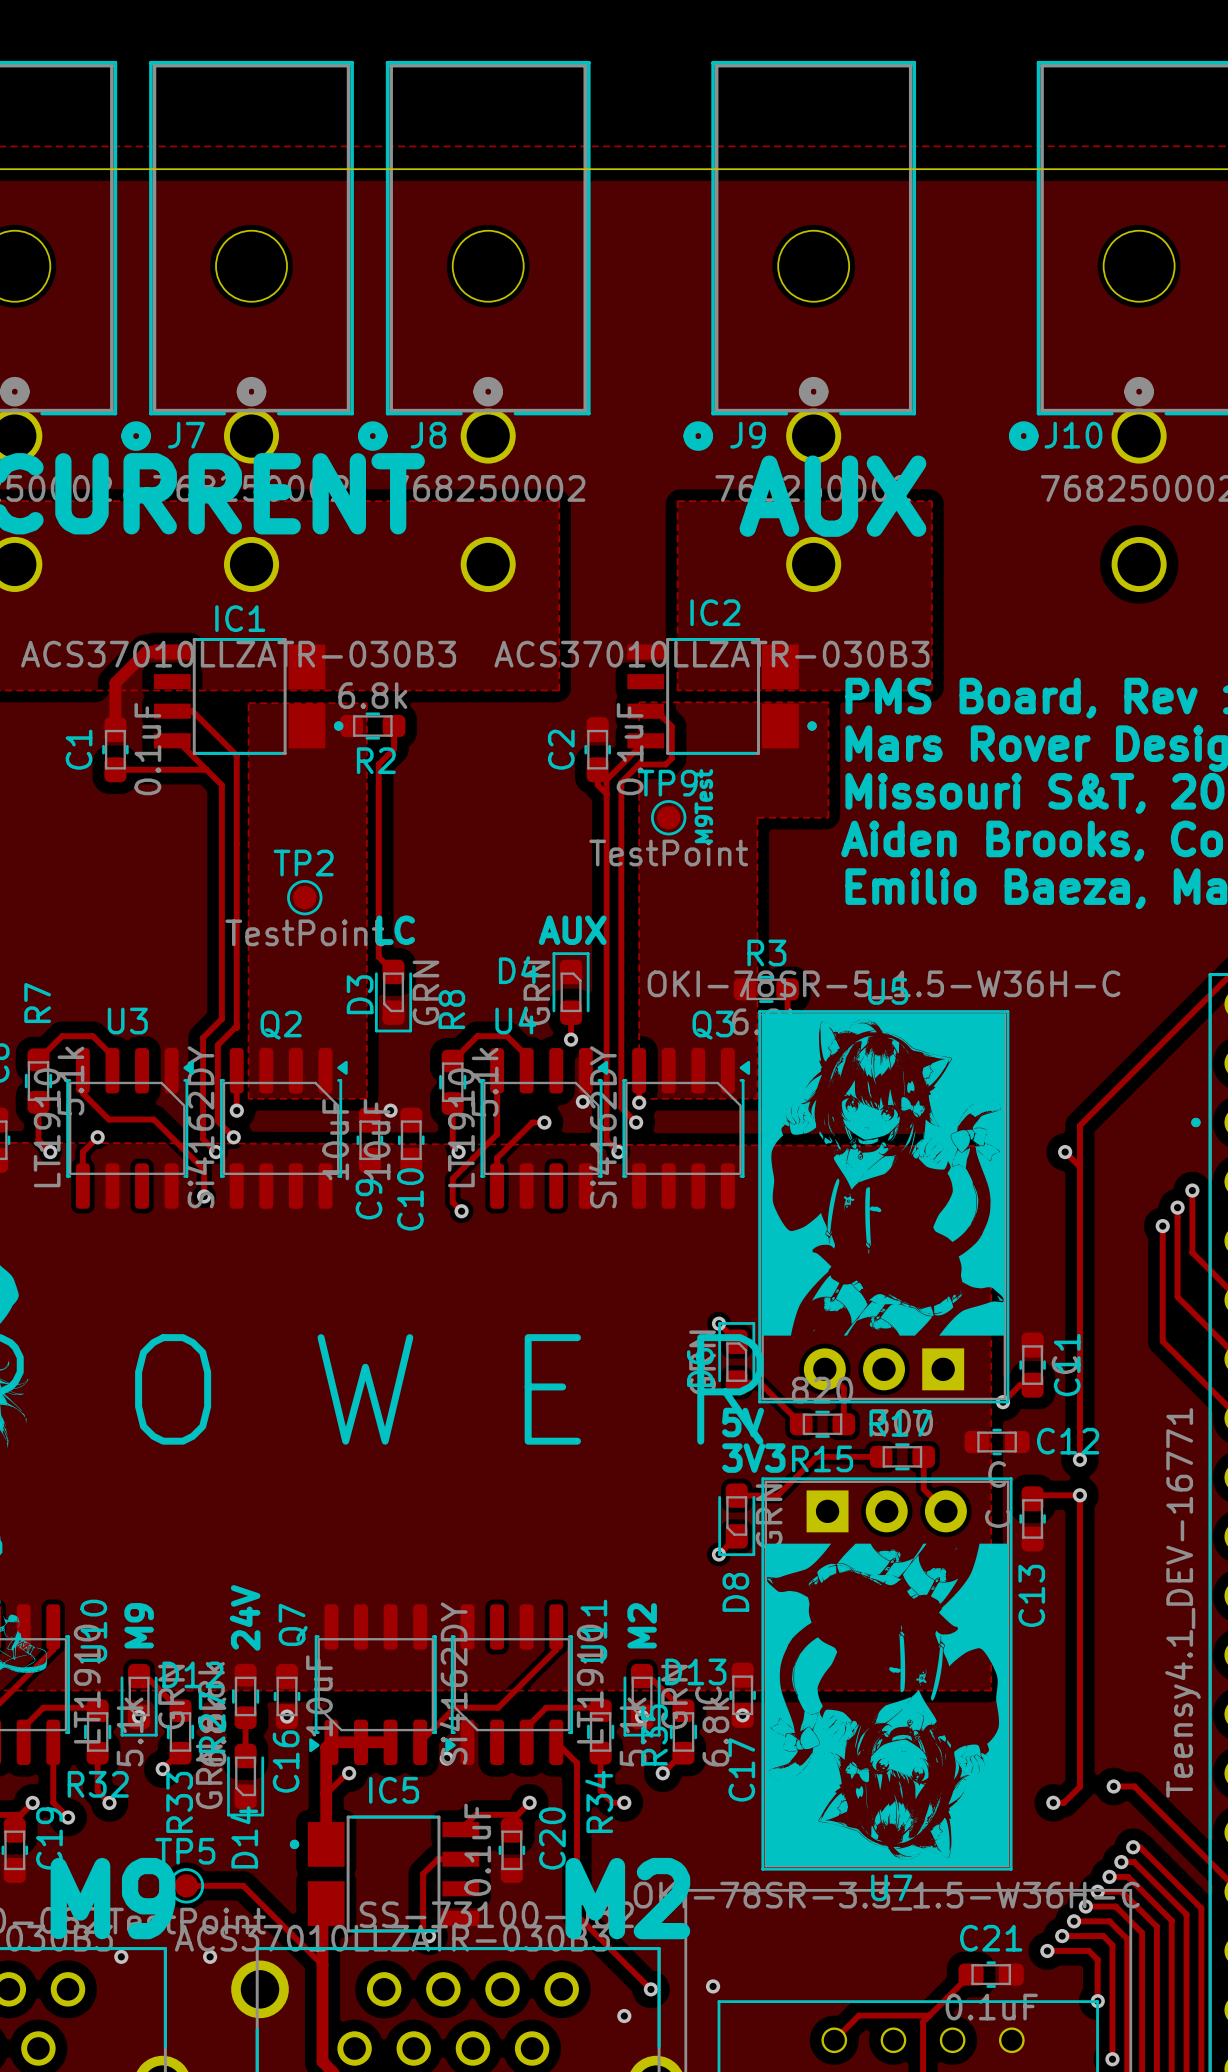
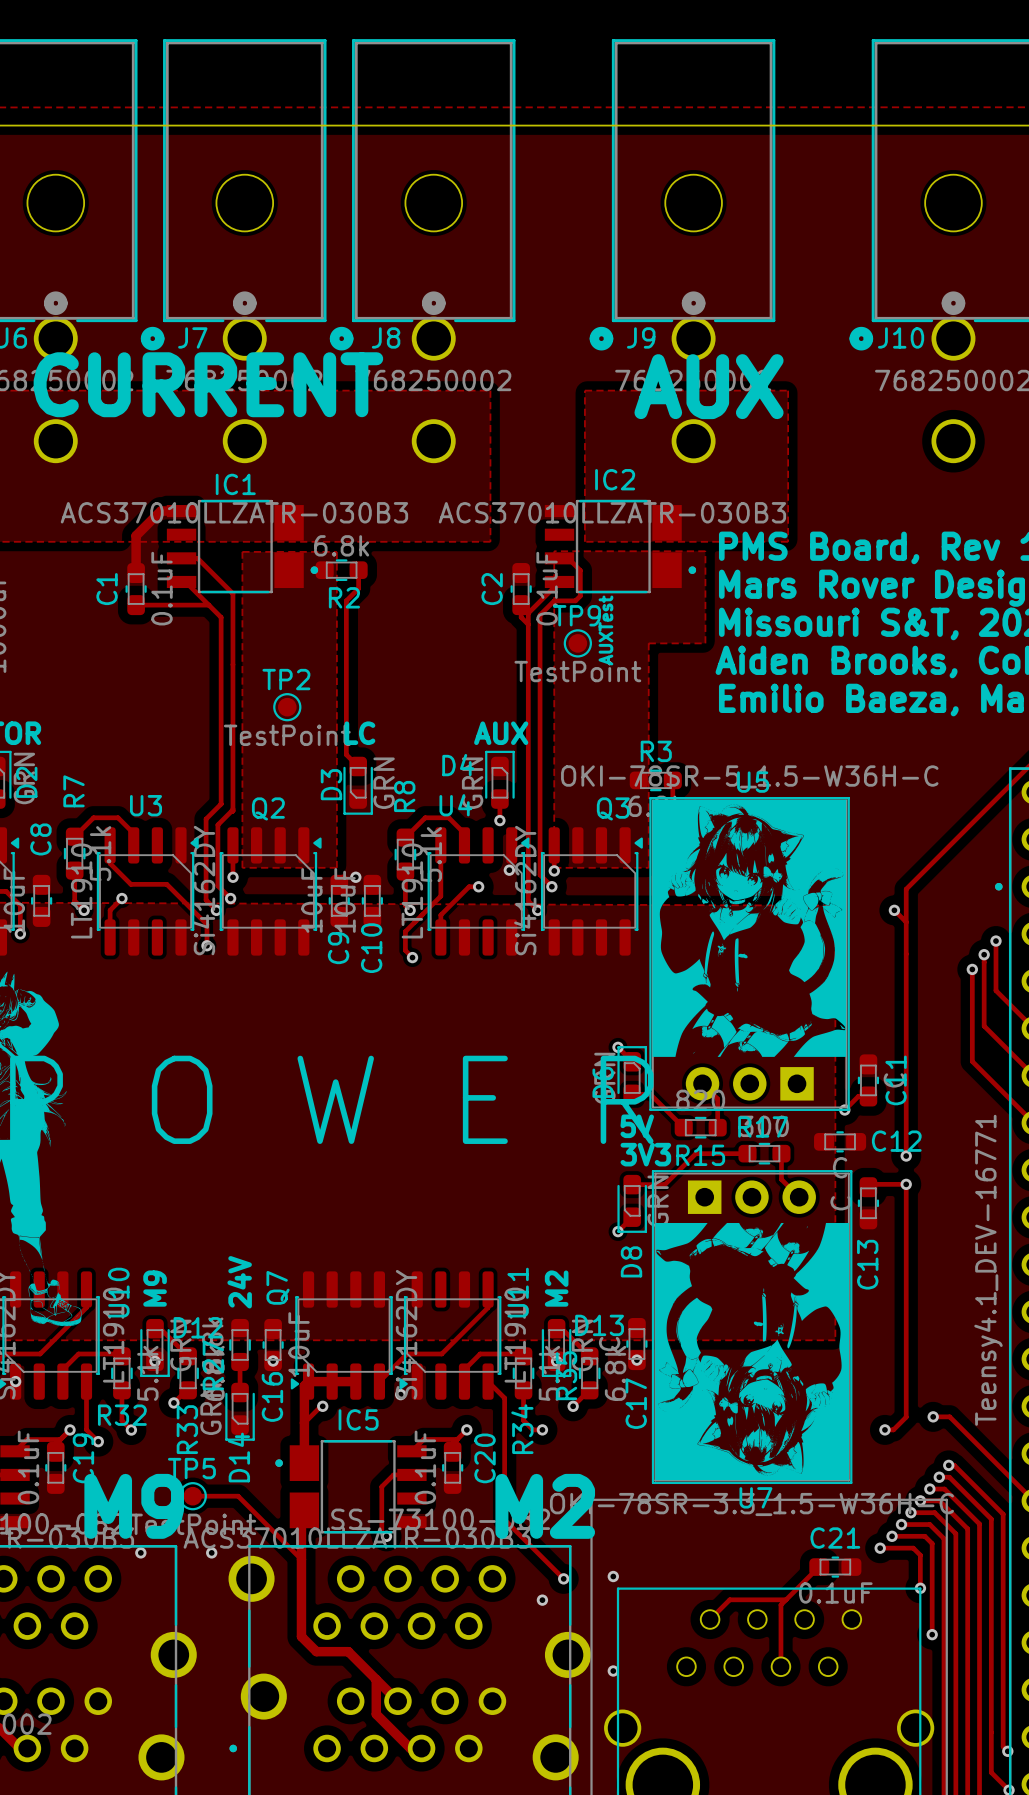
text: M9Test (703, 806) -> AUXTest (605, 630)

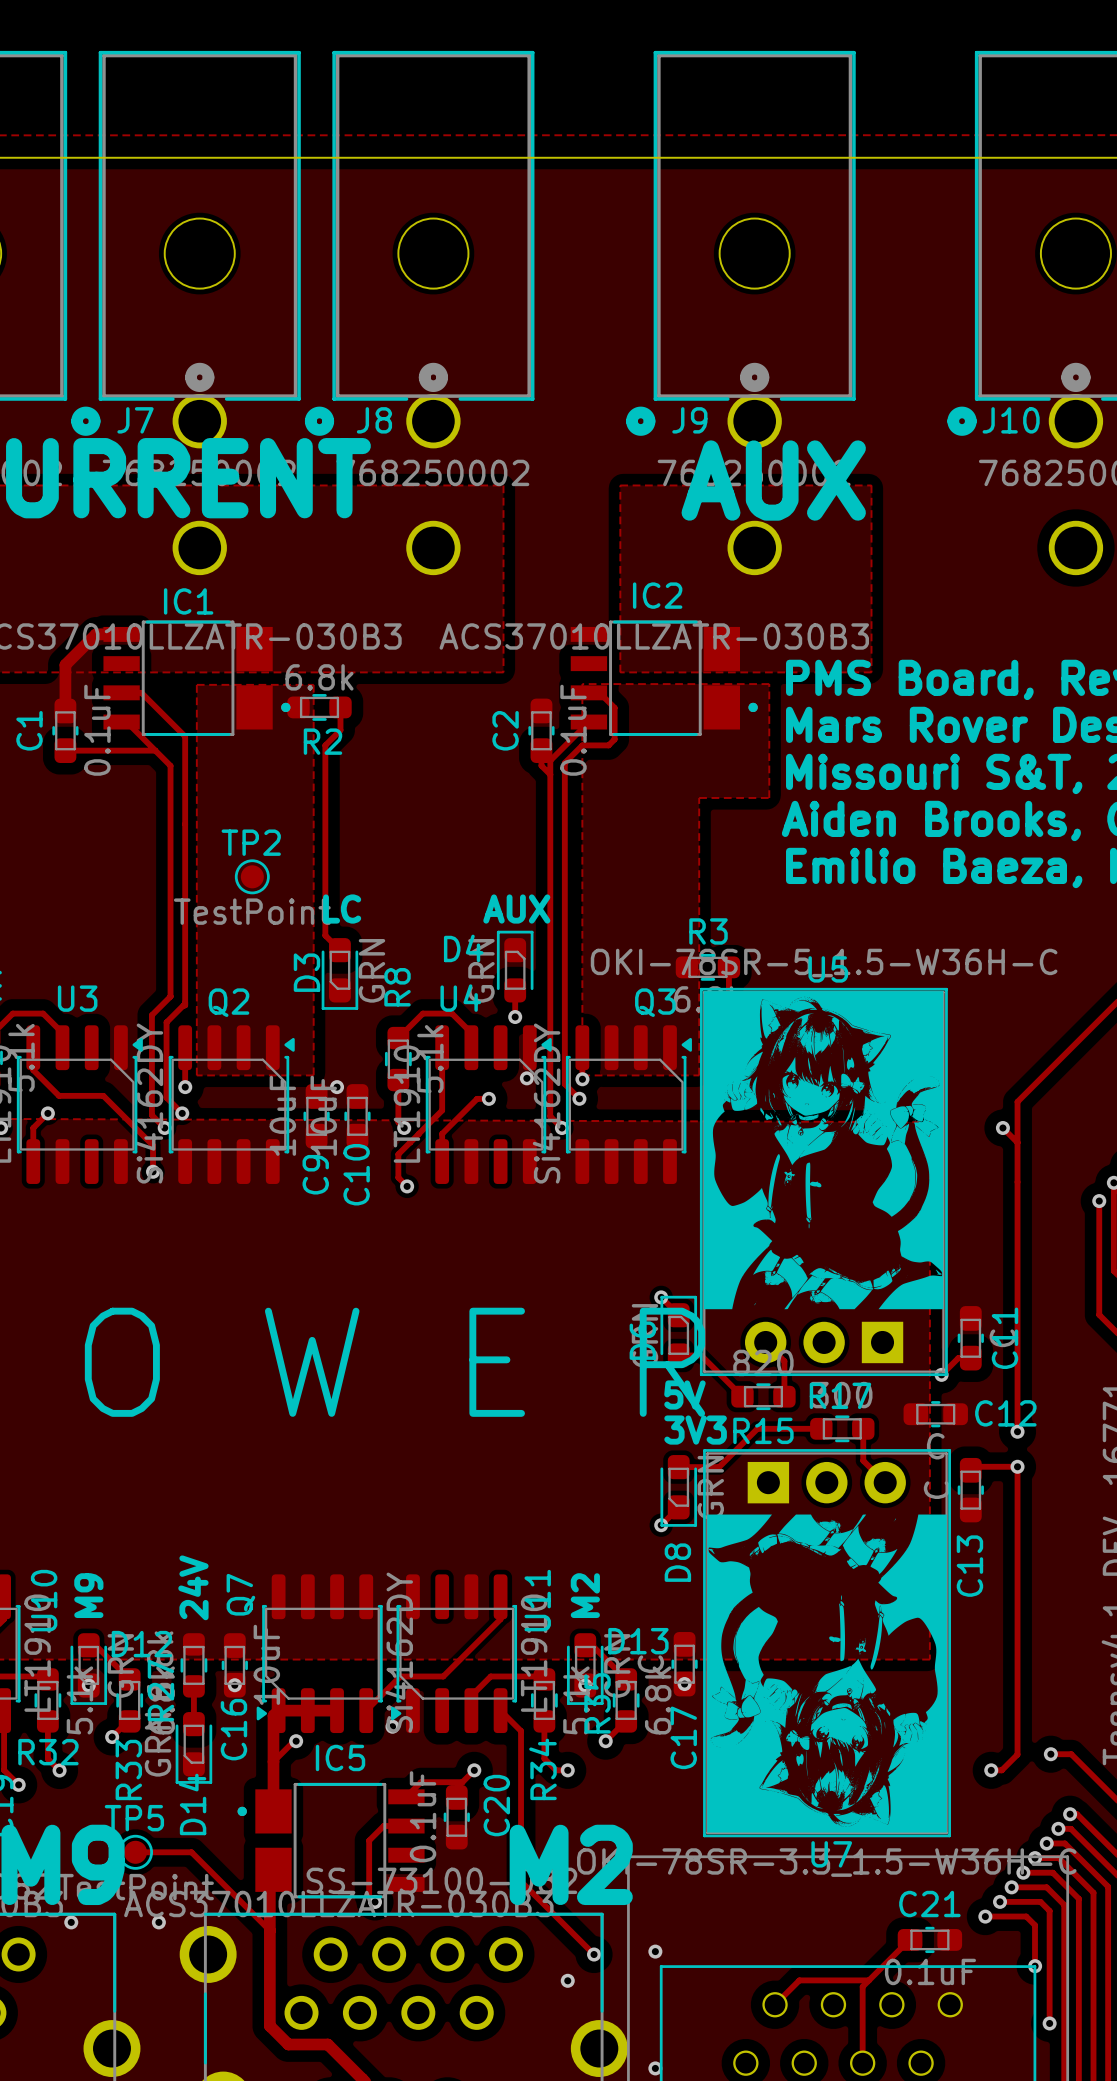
text: AUXTest (605, 630) -> none
TP9: TestPoint (577, 643) -> none

